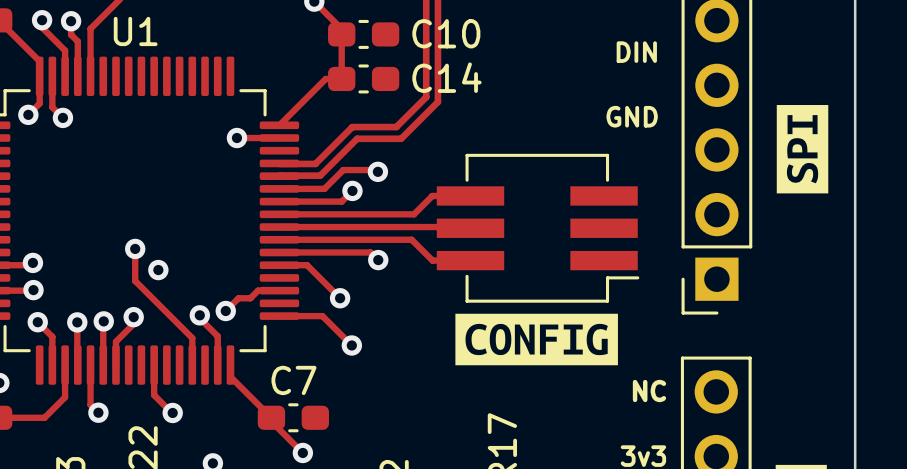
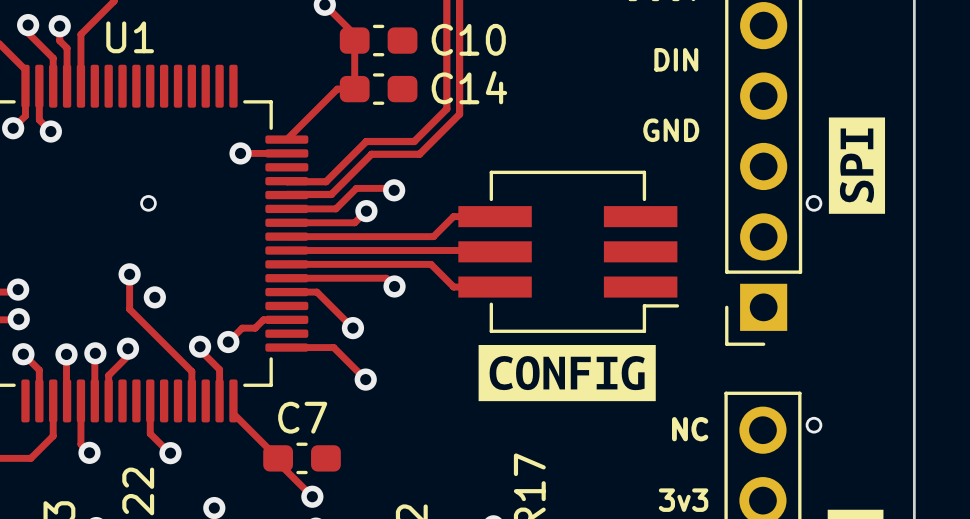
via: none -> (148, 203)
via: none -> (813, 203)
via: none -> (813, 425)

